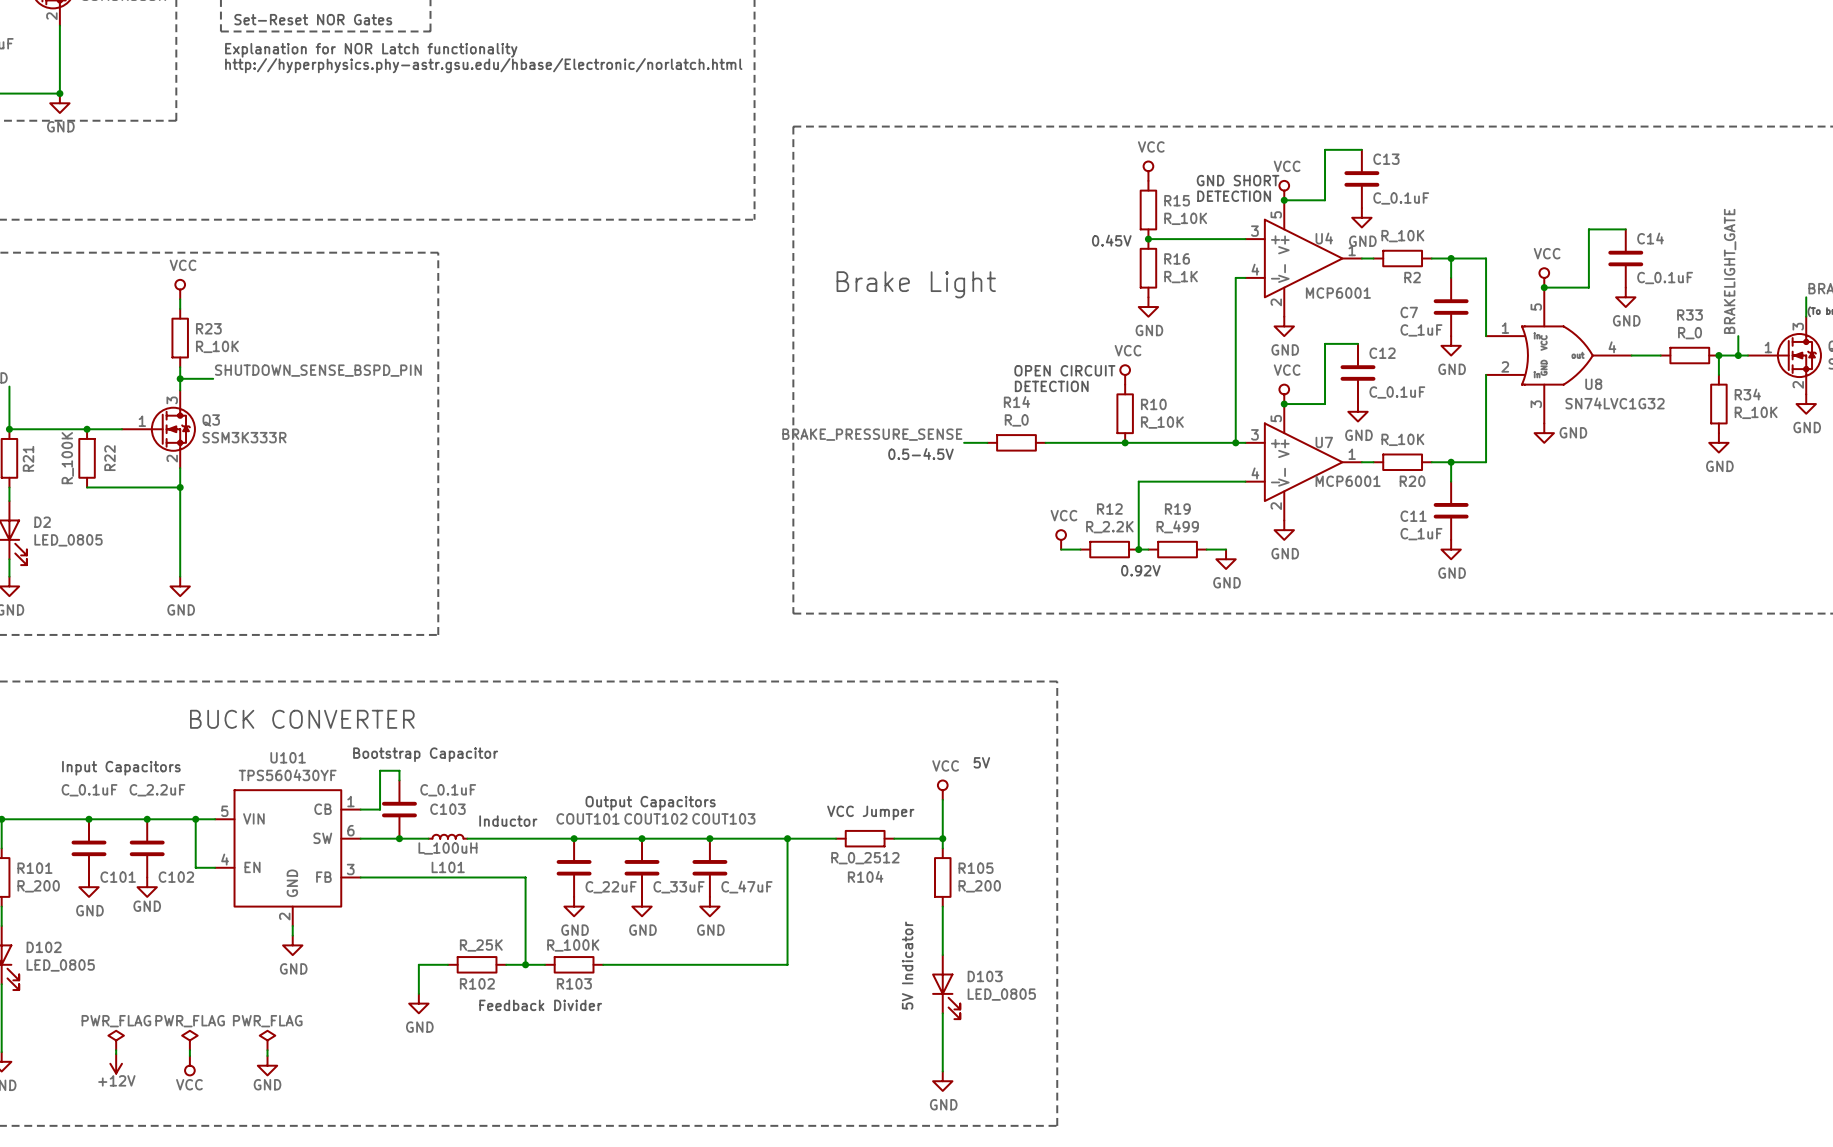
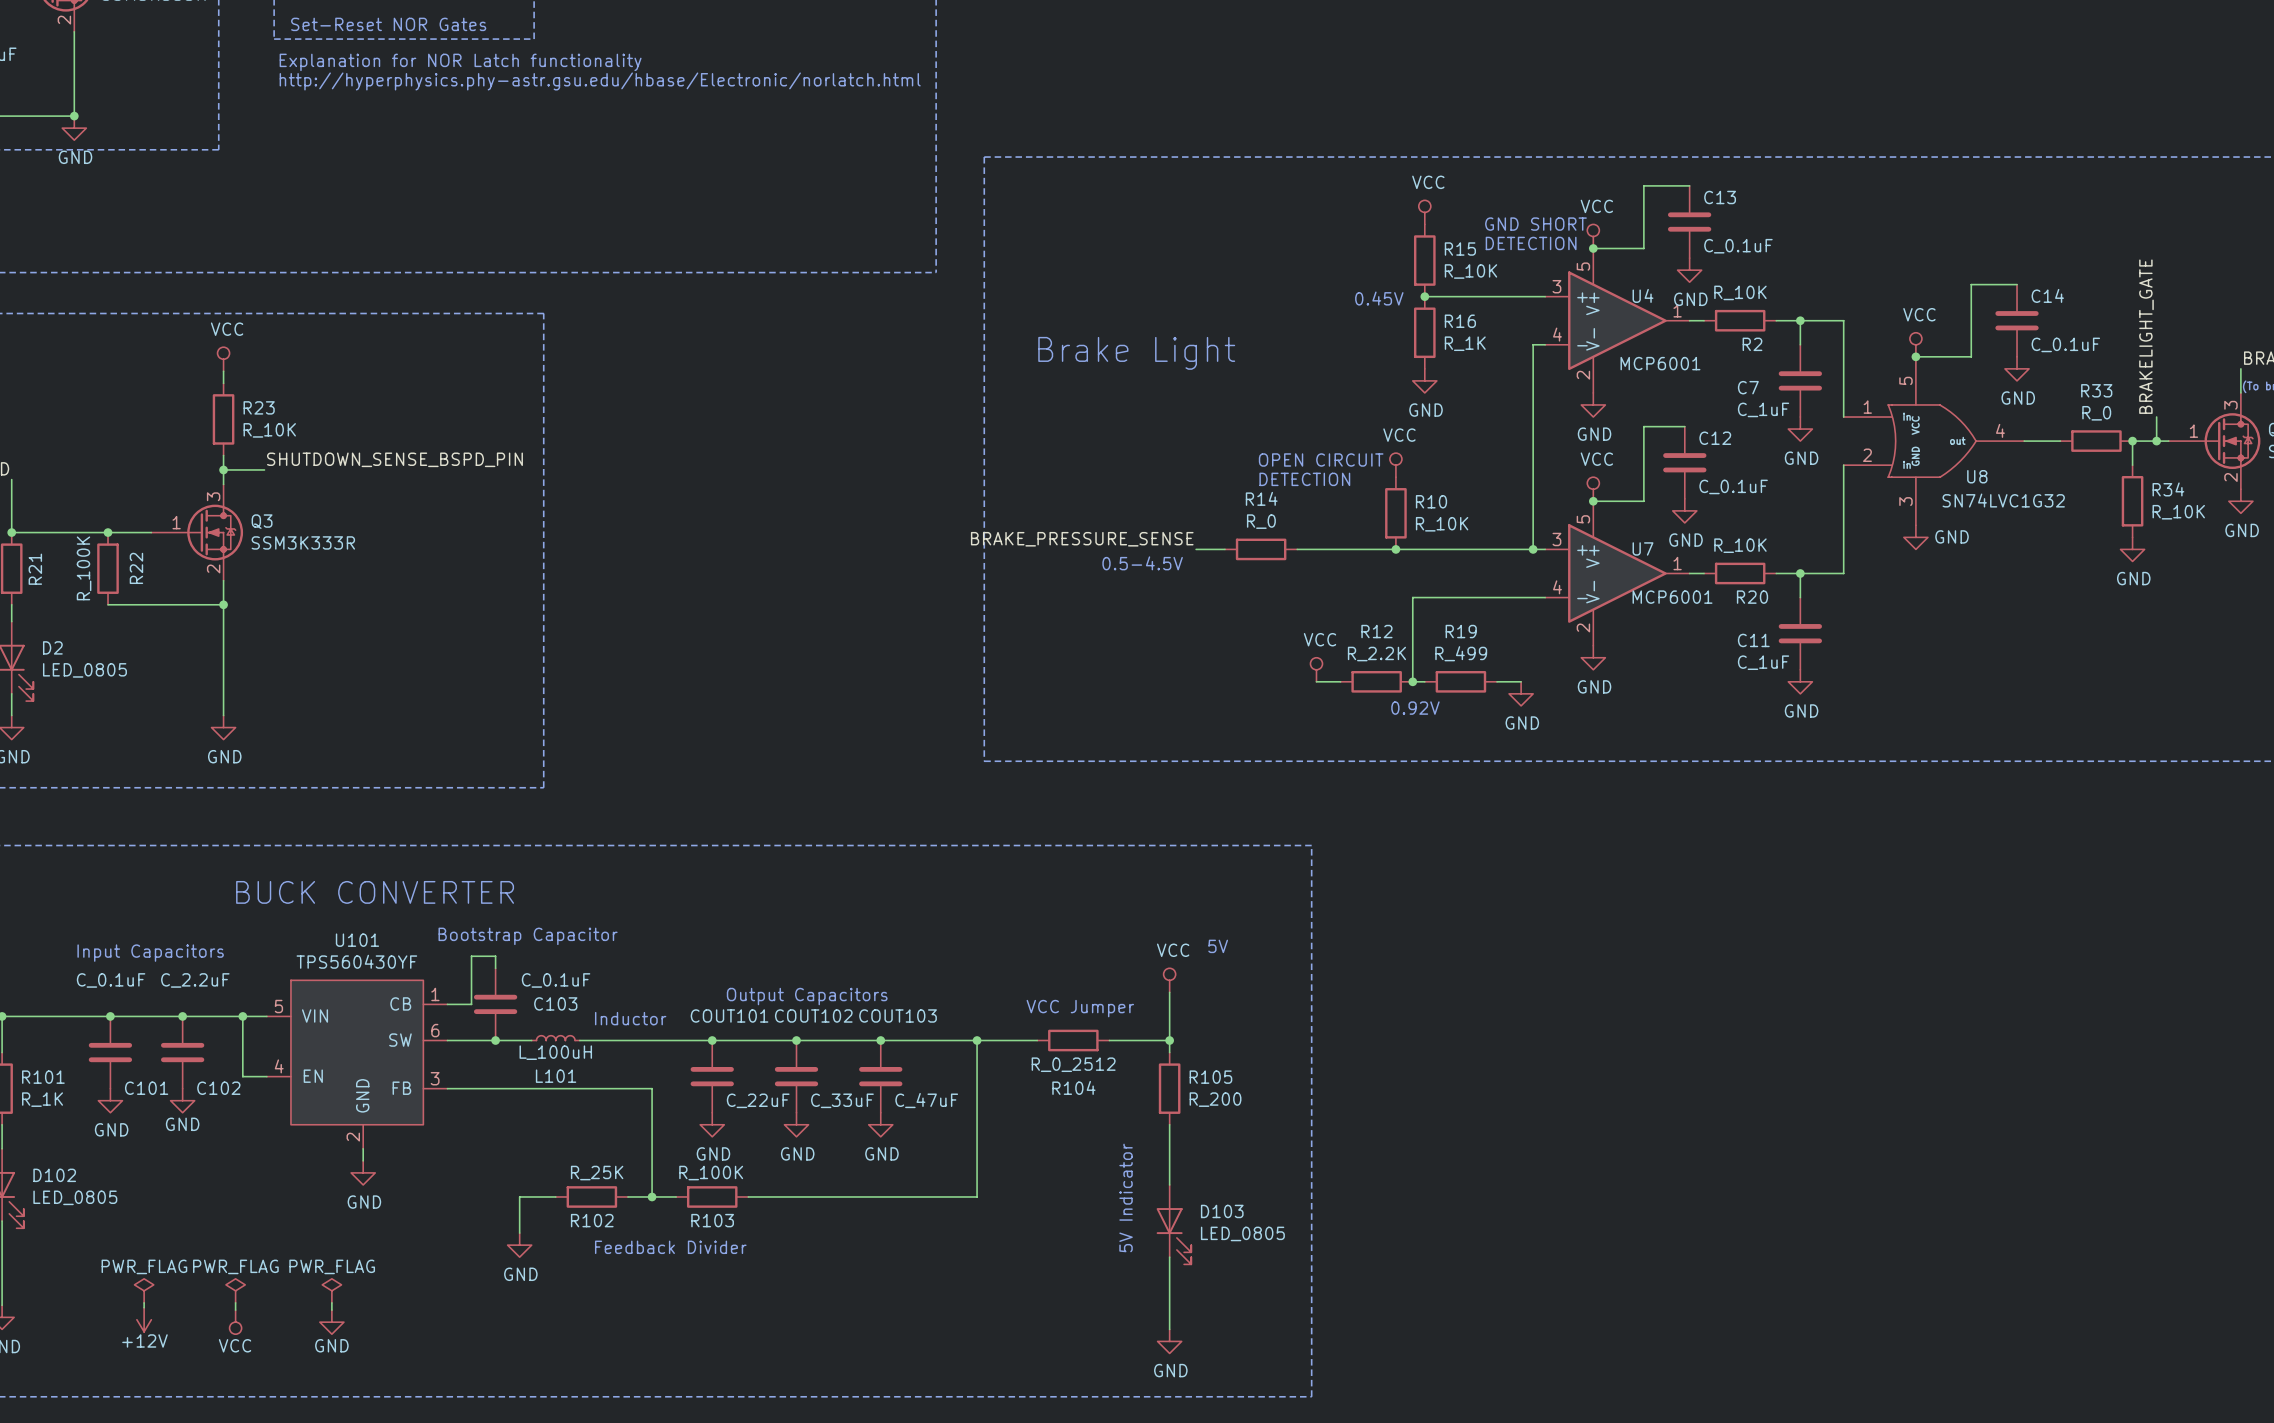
R101 value: R_200 (38, 886) -> R_1K (42, 1099)

